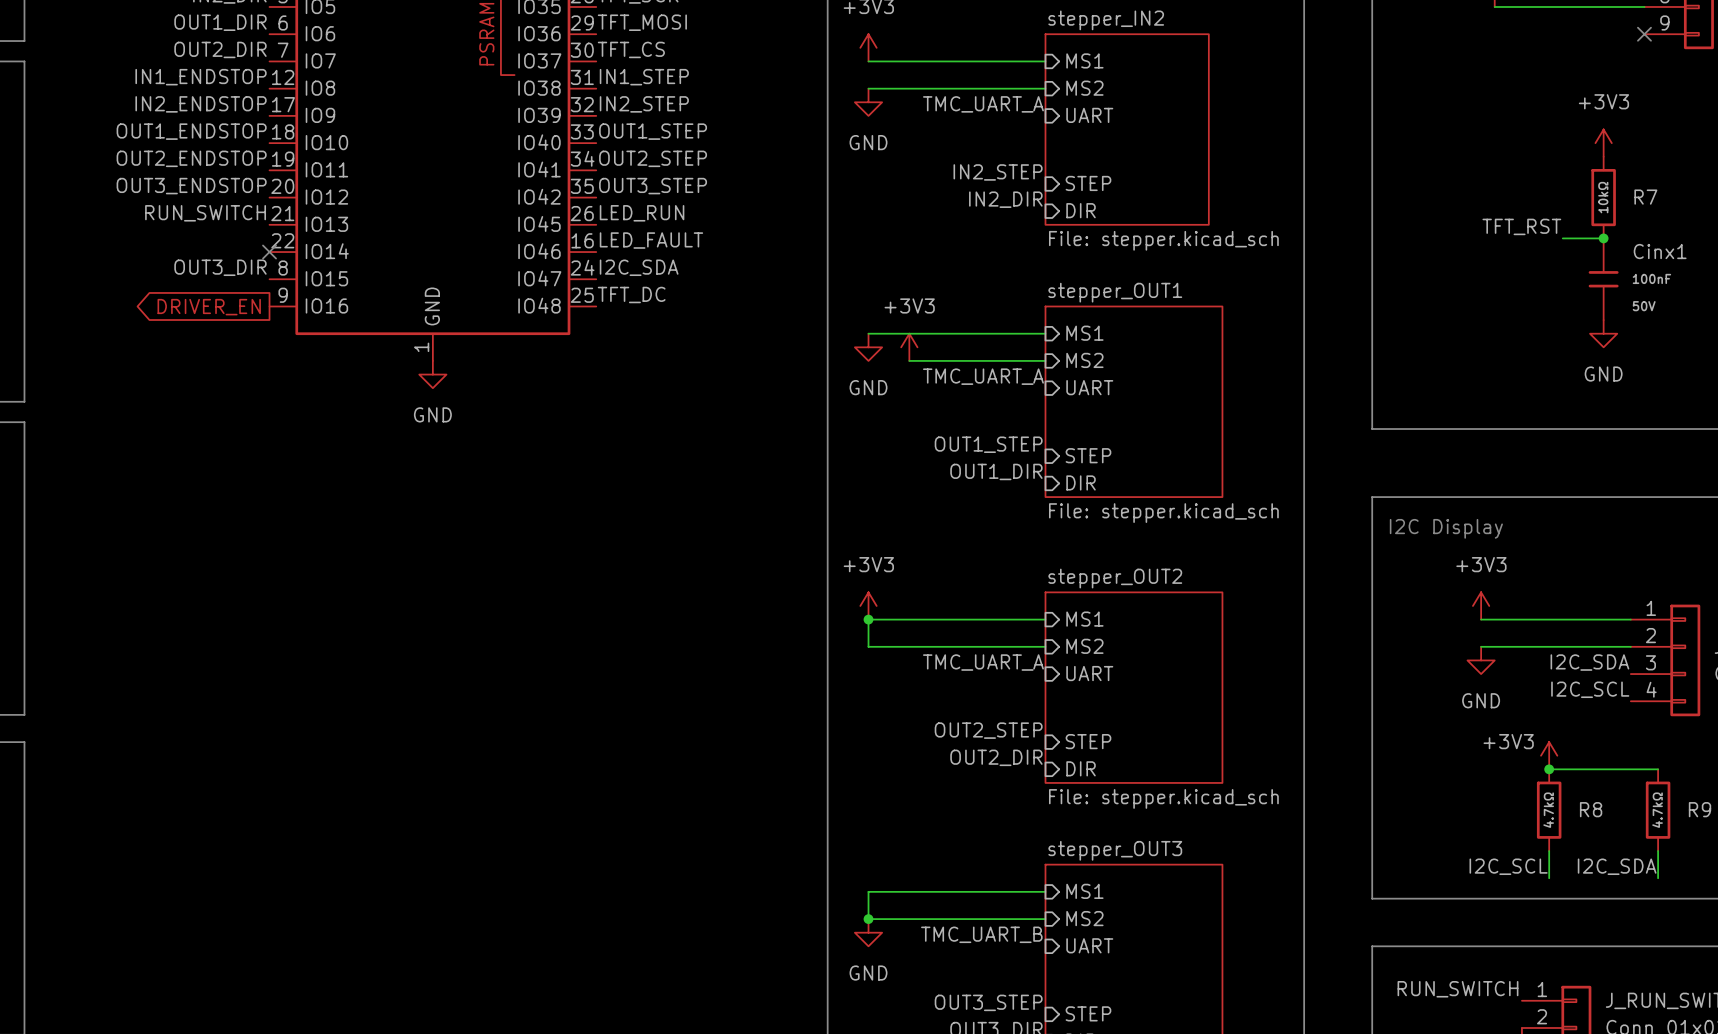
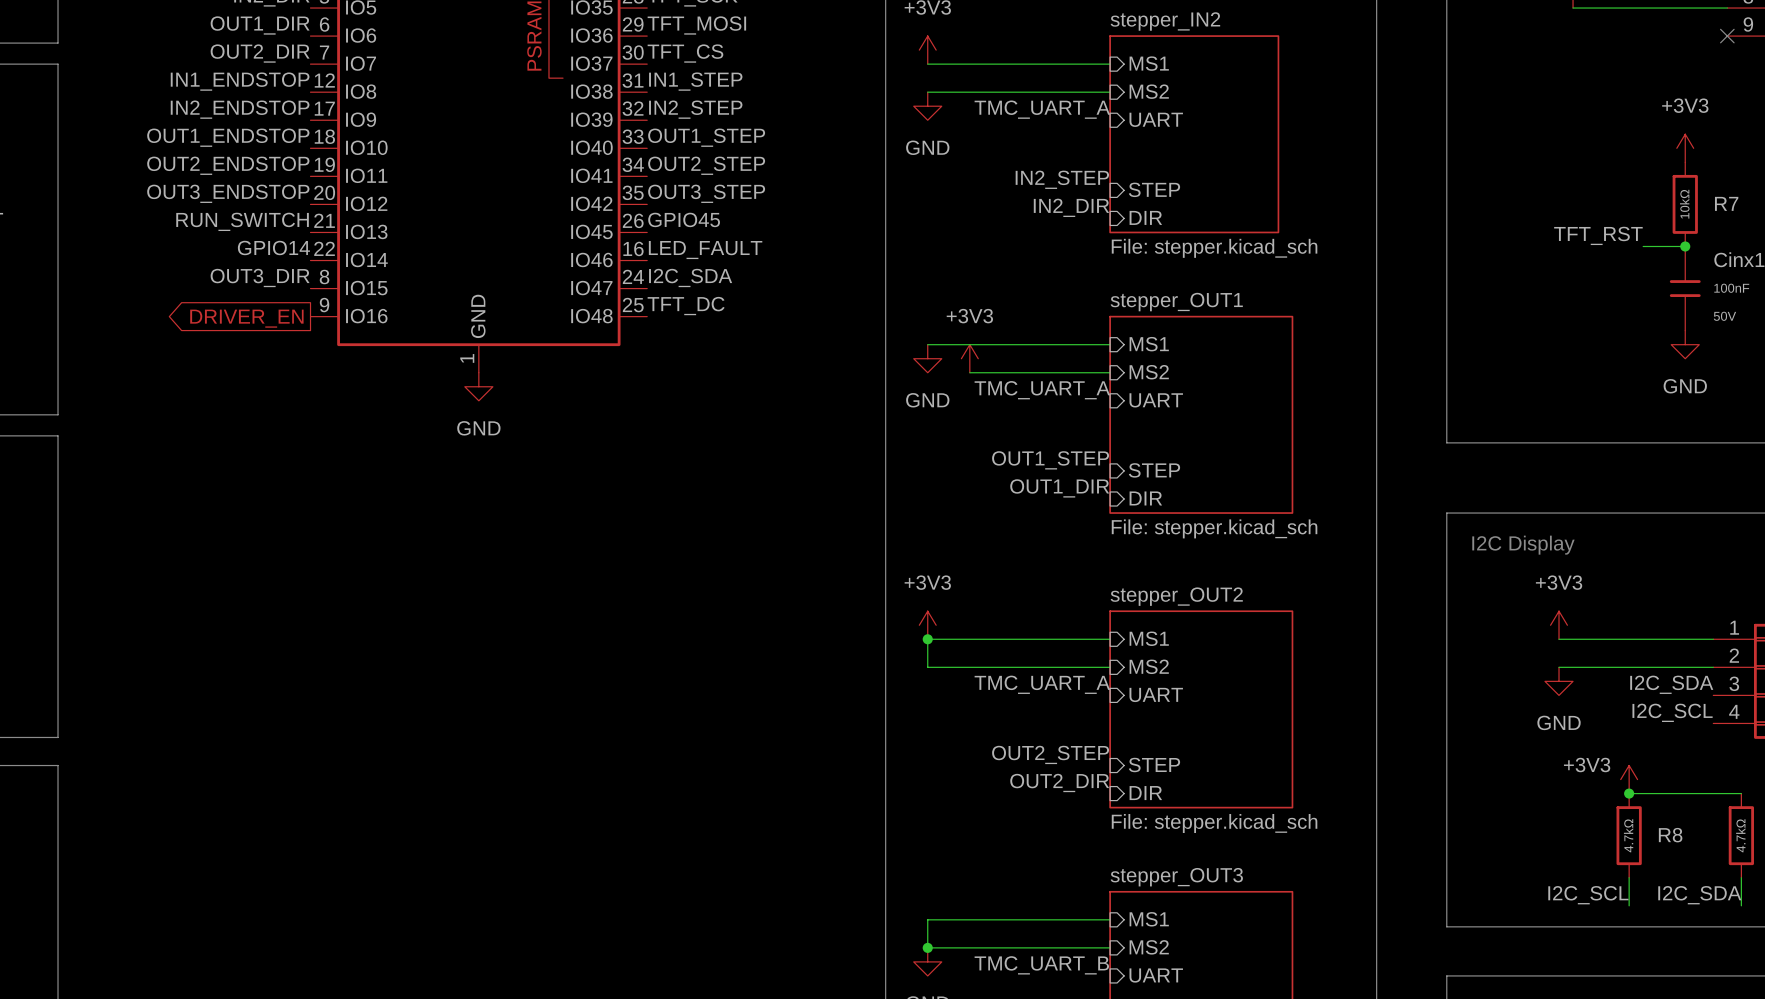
label: LED_RUN (642, 213) -> GPIO45 (684, 219)
label: none -> GPIO14 (273, 248)
no-connect mark: (269, 252) -> none

